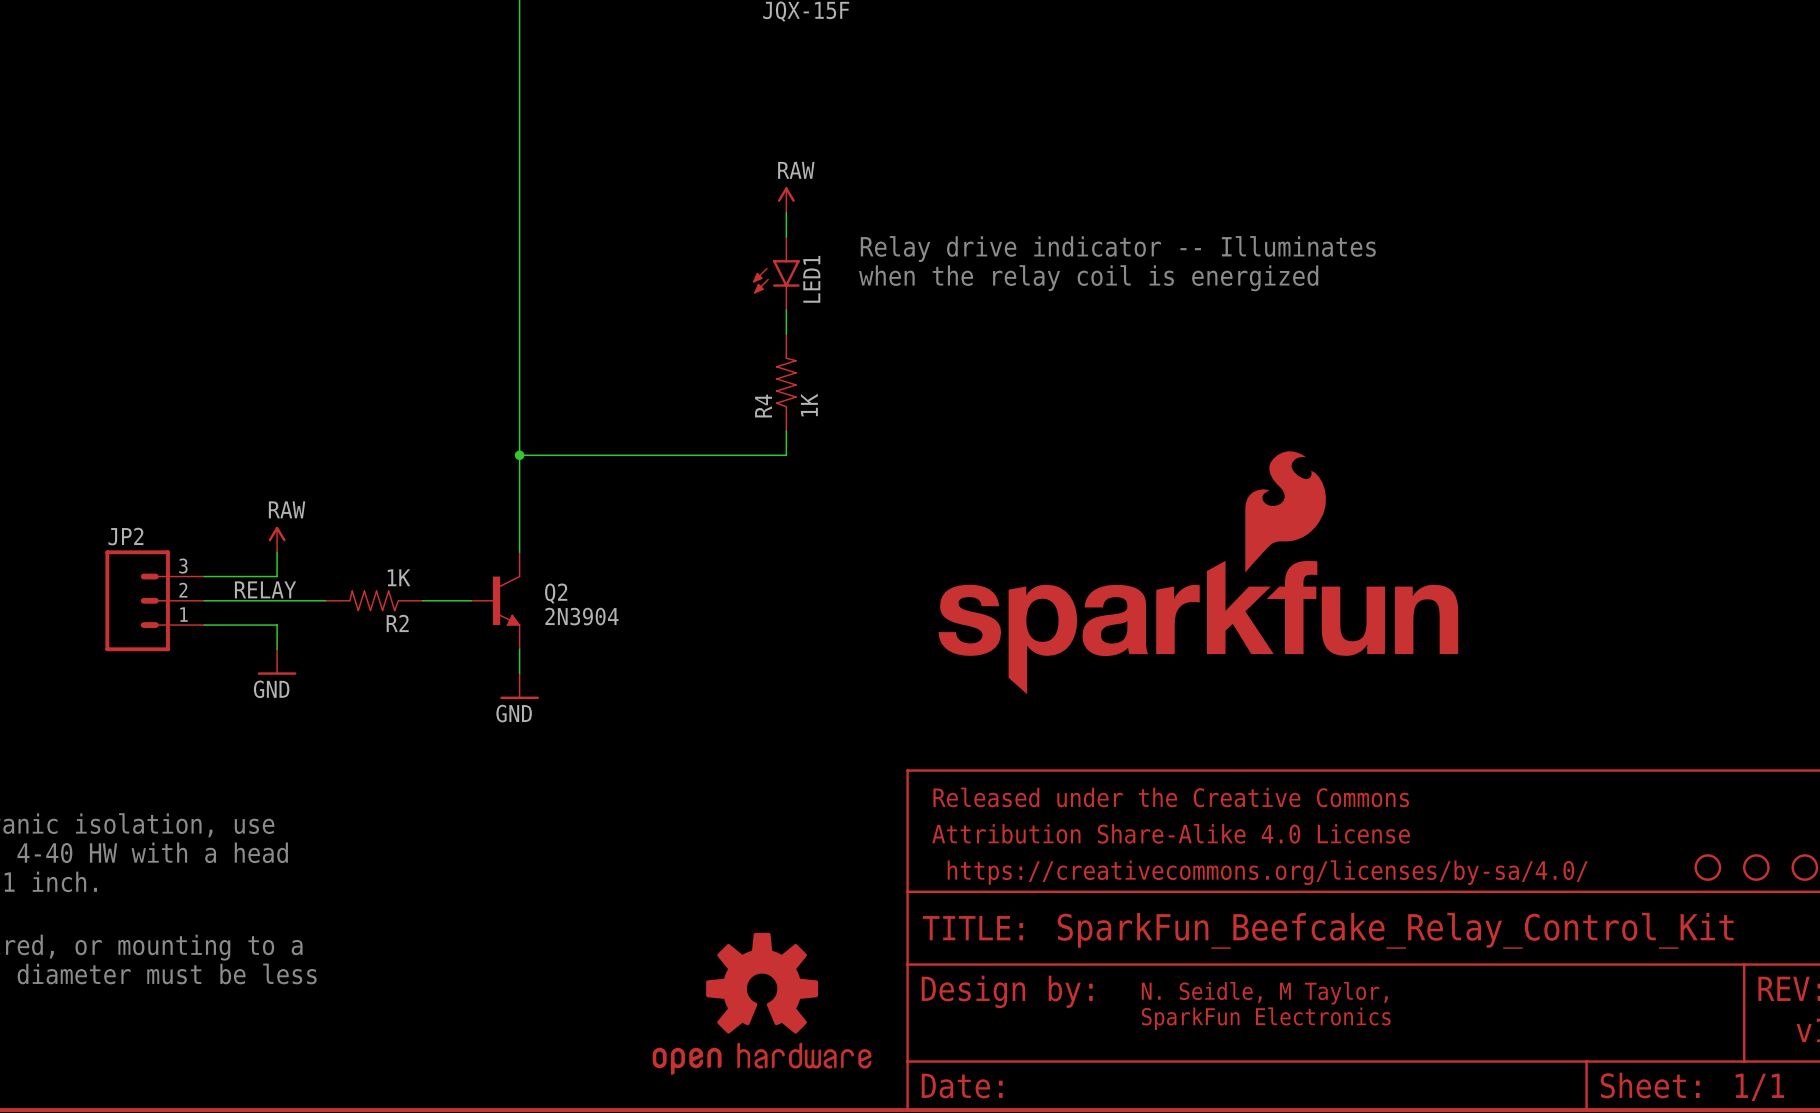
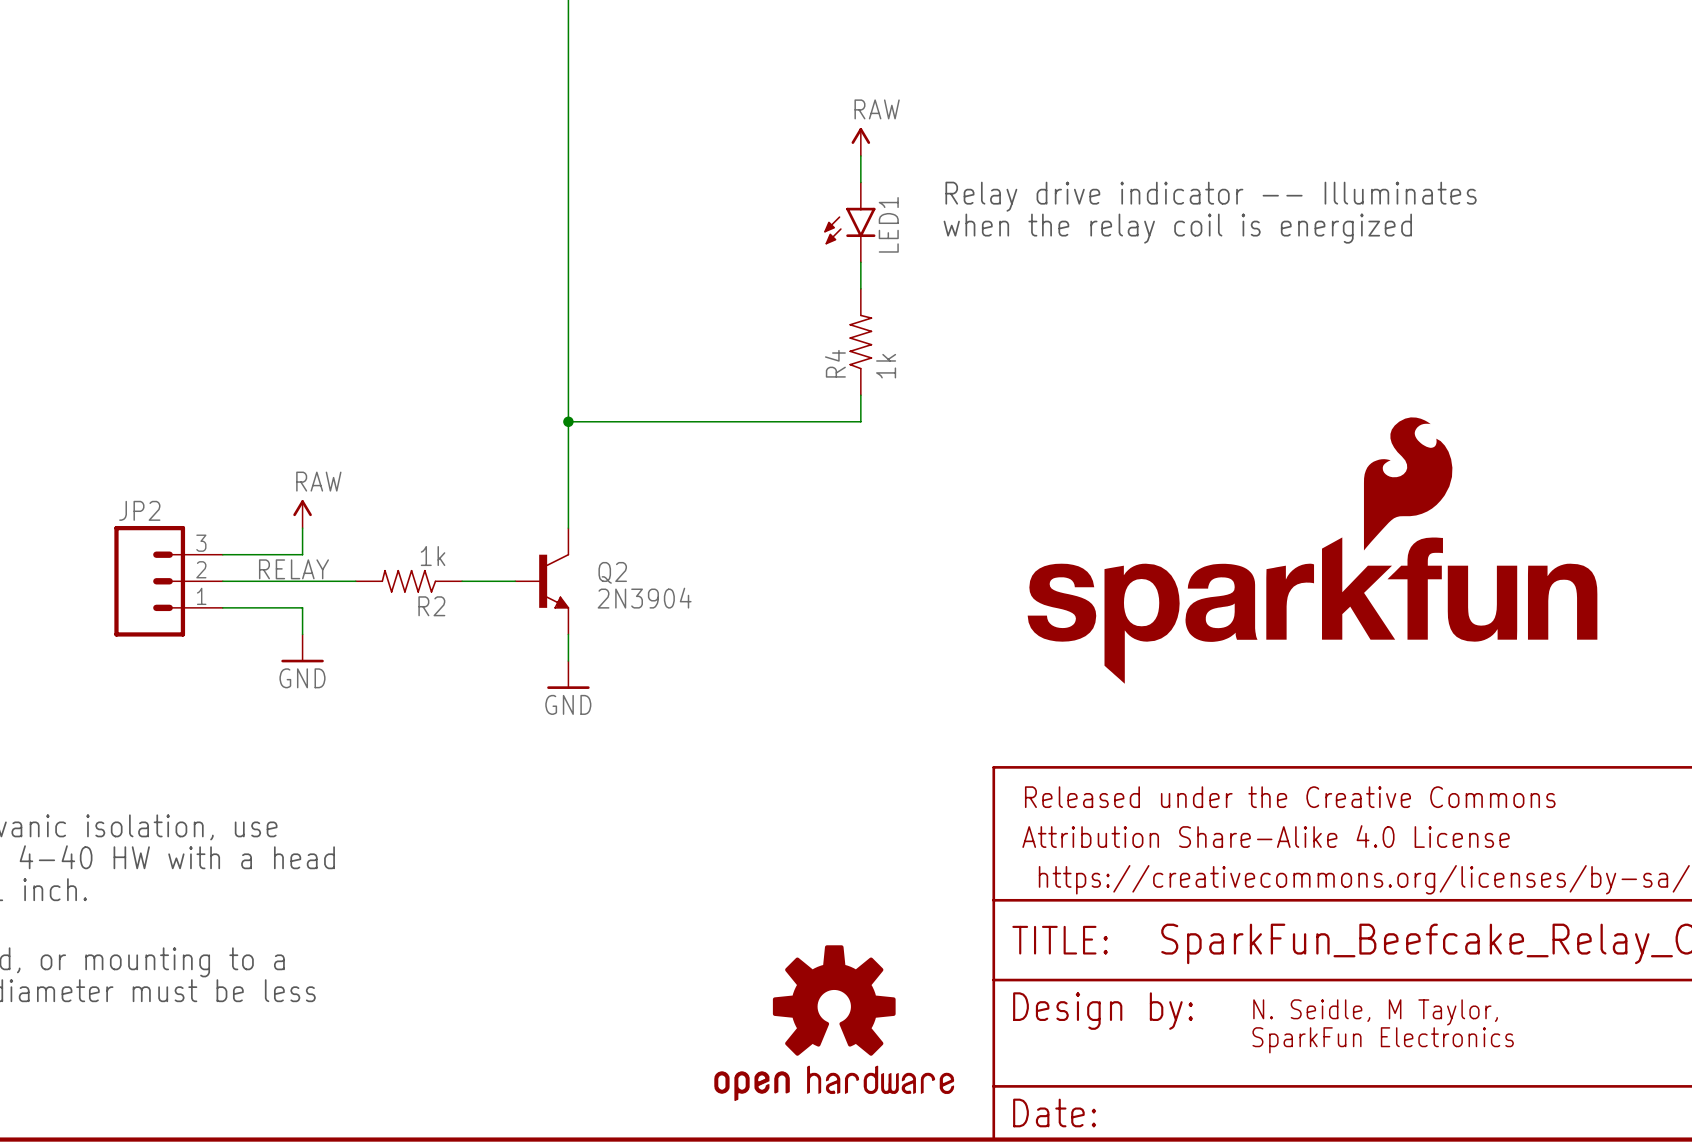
R4 value: 1K (809, 405) -> 1k (886, 366)
R2 value: 1K (399, 577) -> 1k (433, 556)

